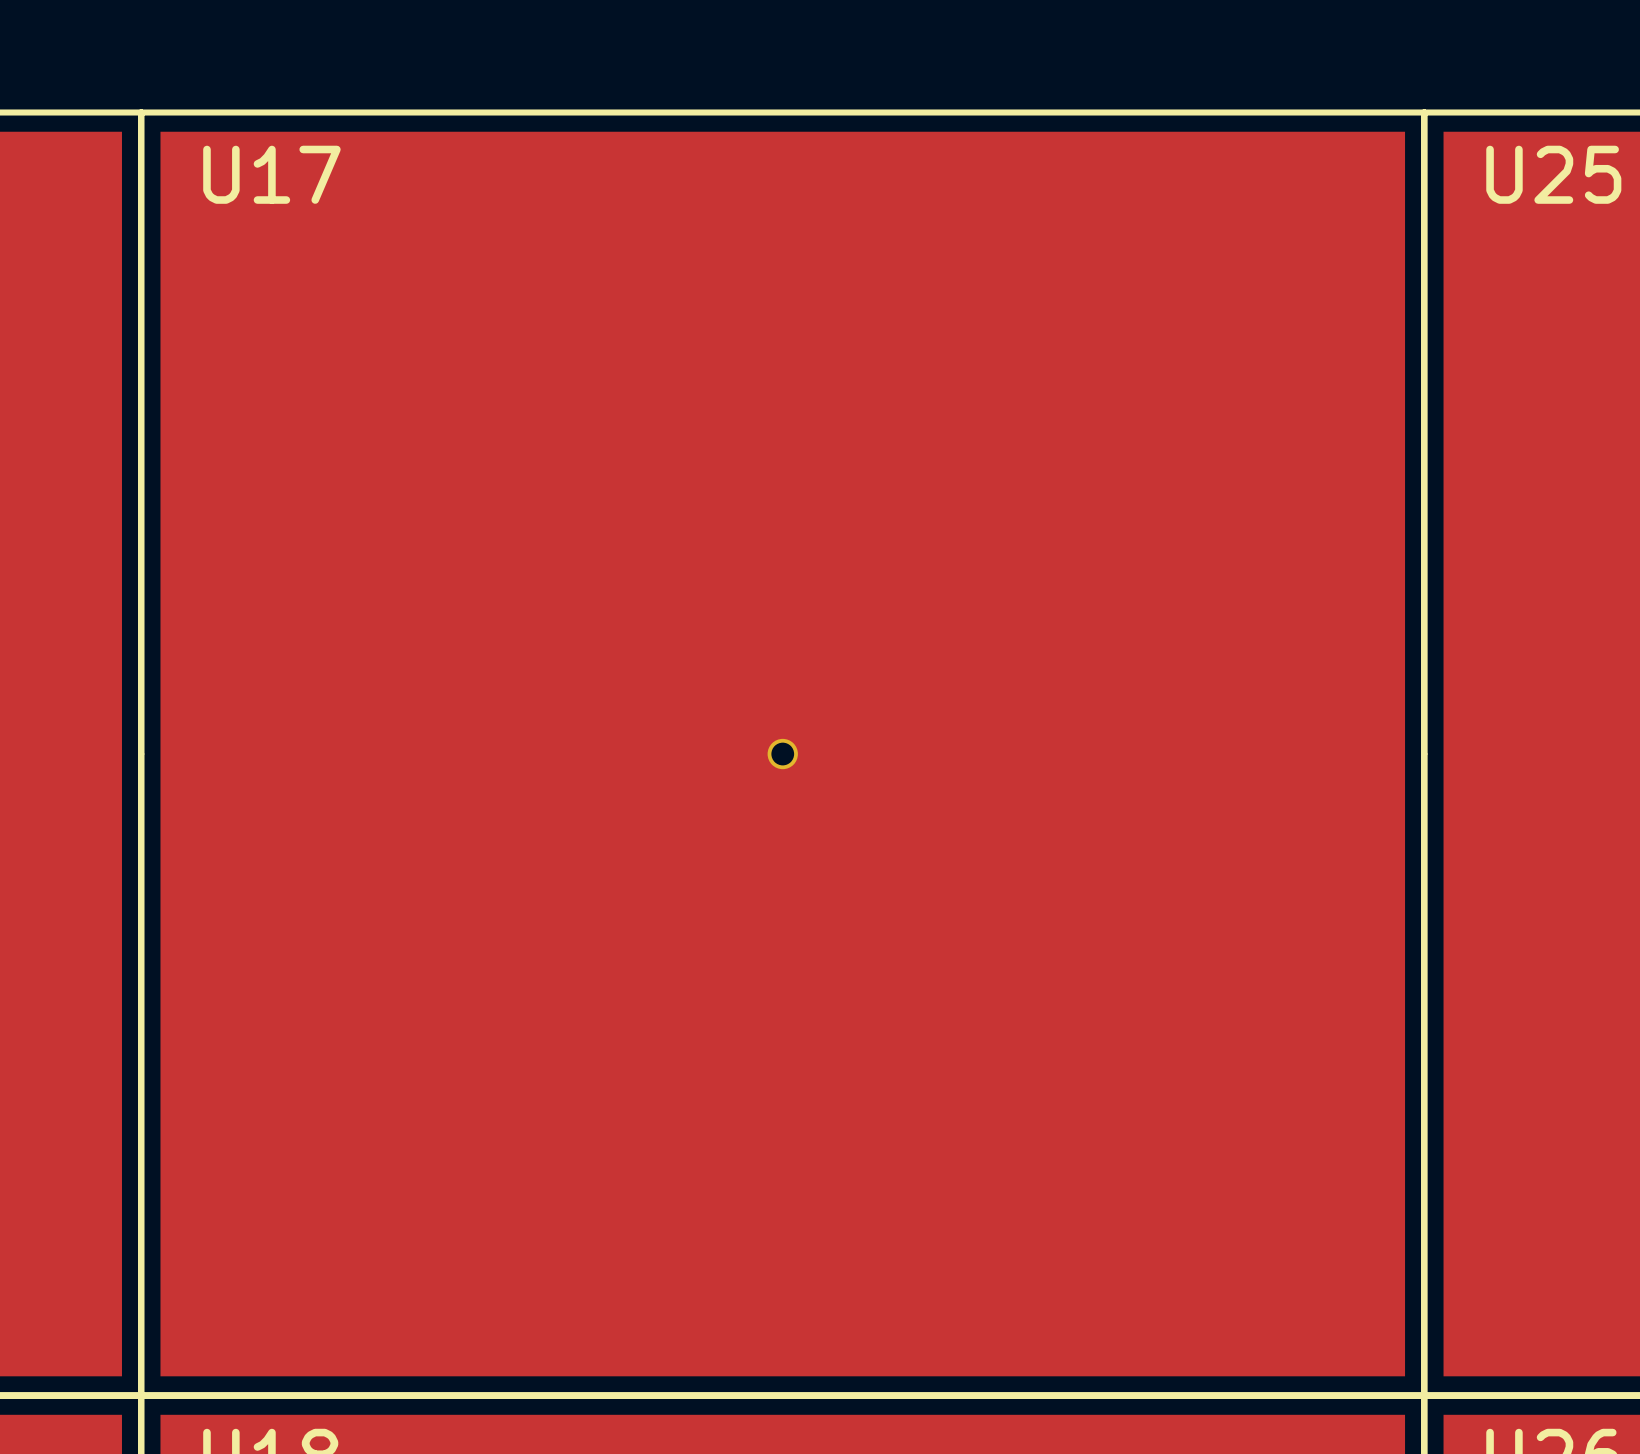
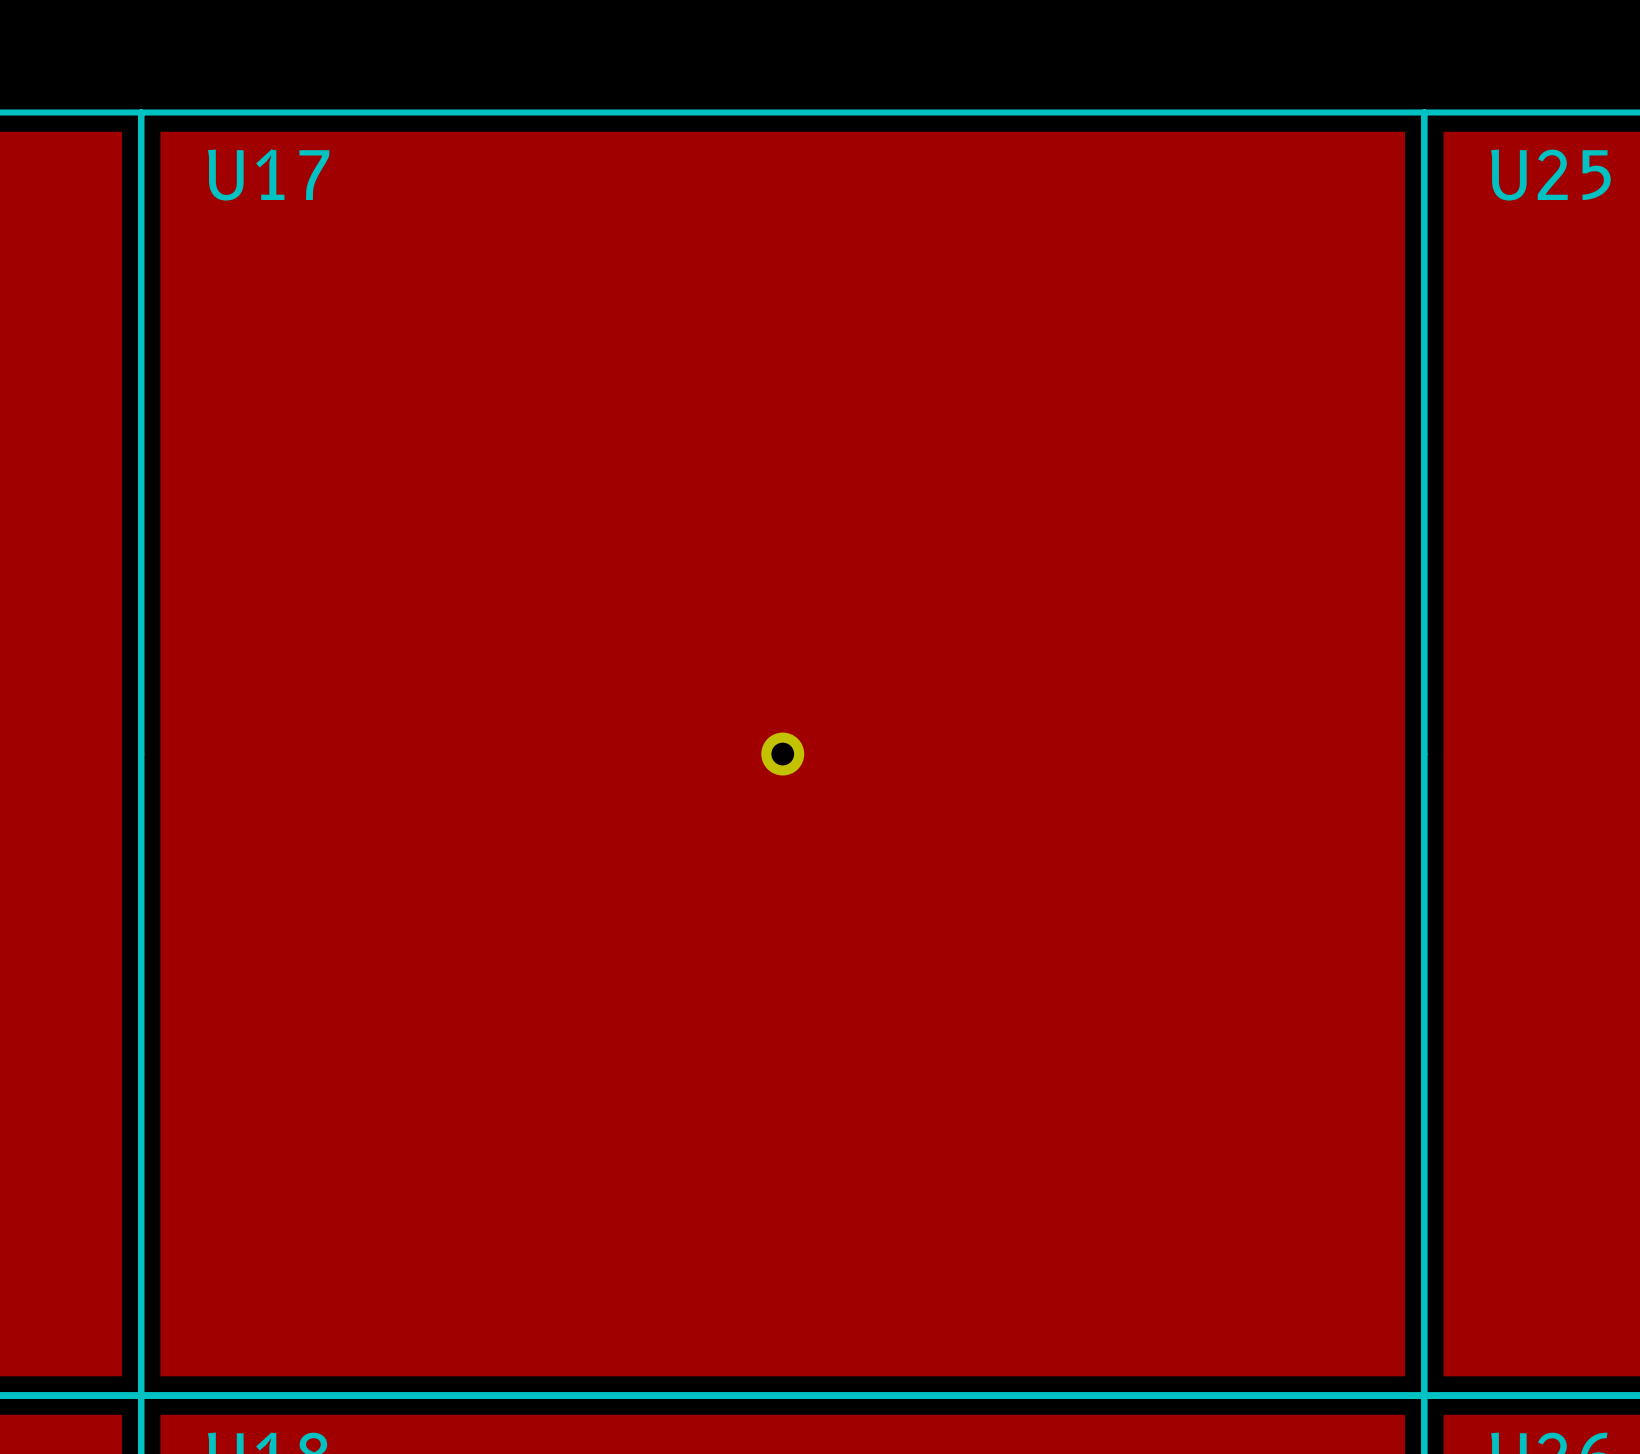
part footprint: [767, 738, 798, 770] -> [761, 732, 805, 776]

